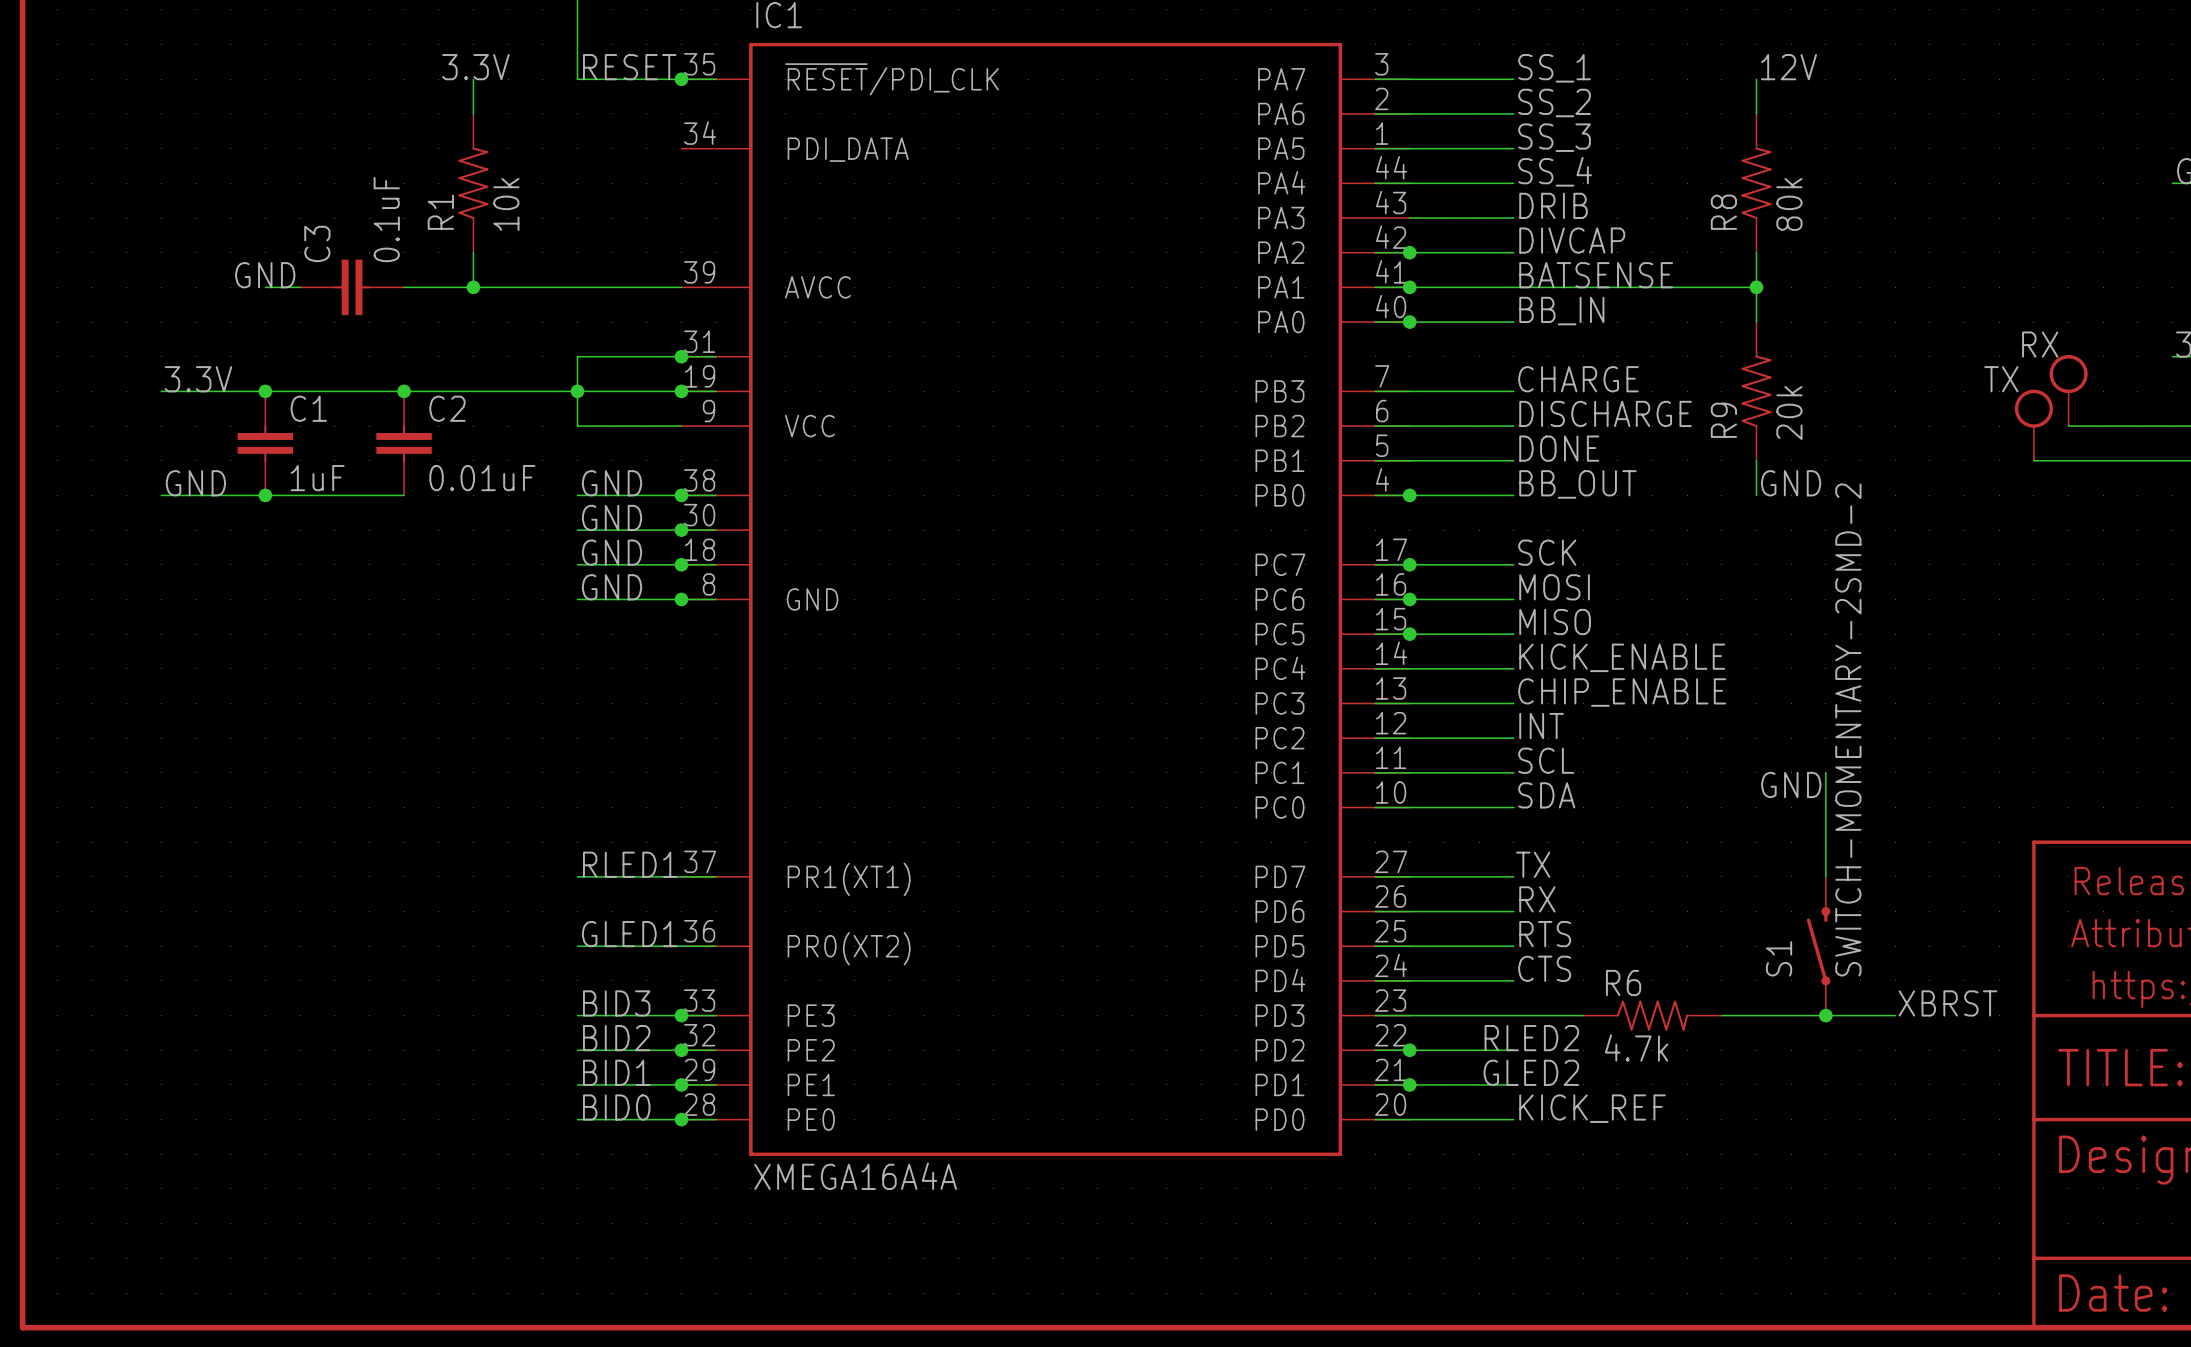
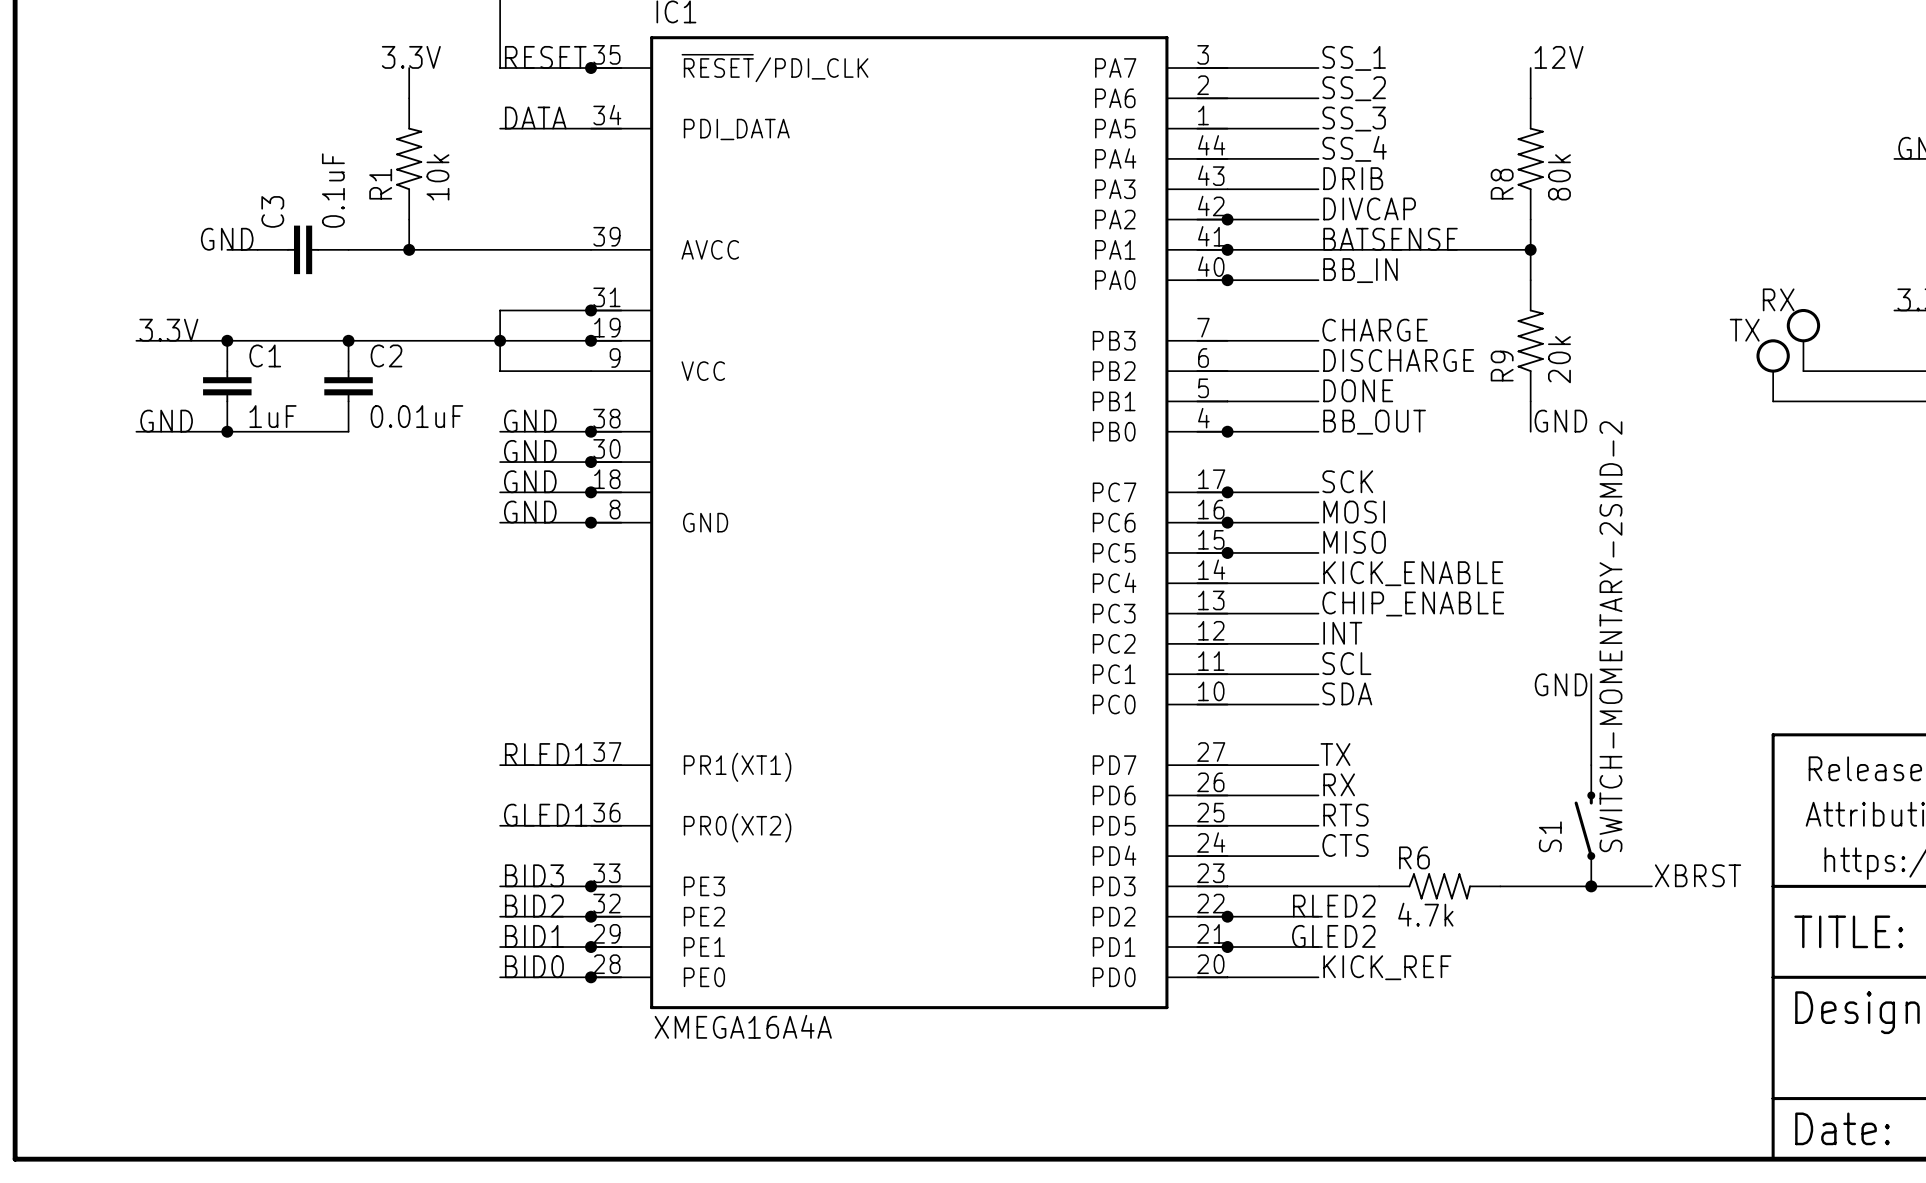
label: none -> DATA (535, 118)
wire: none -> (500, 128) (621, 128)

